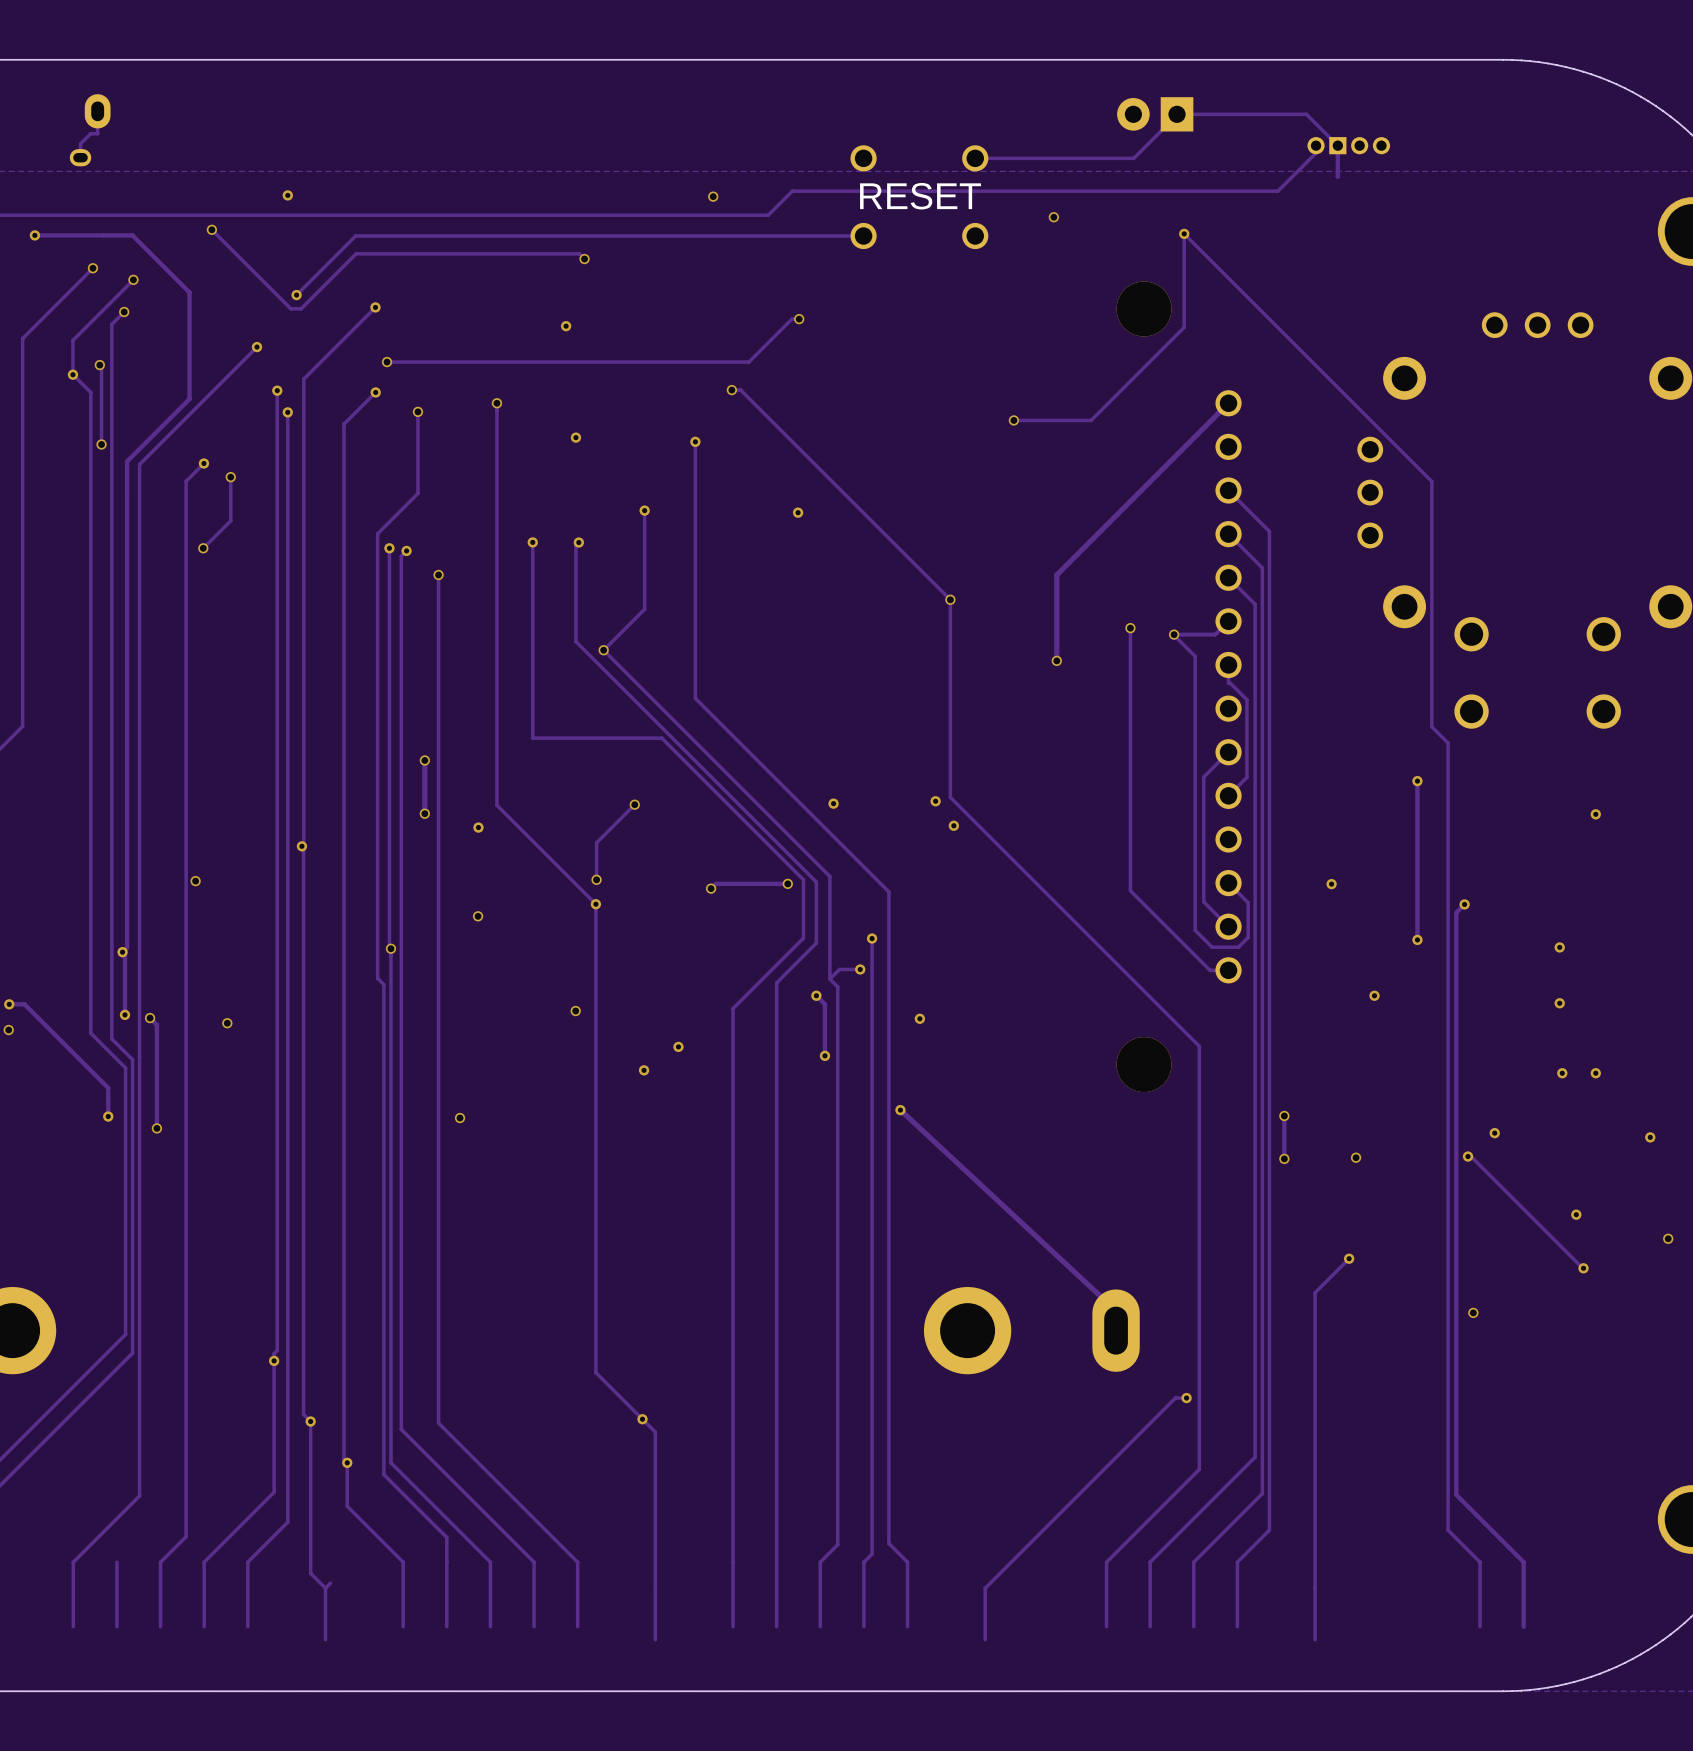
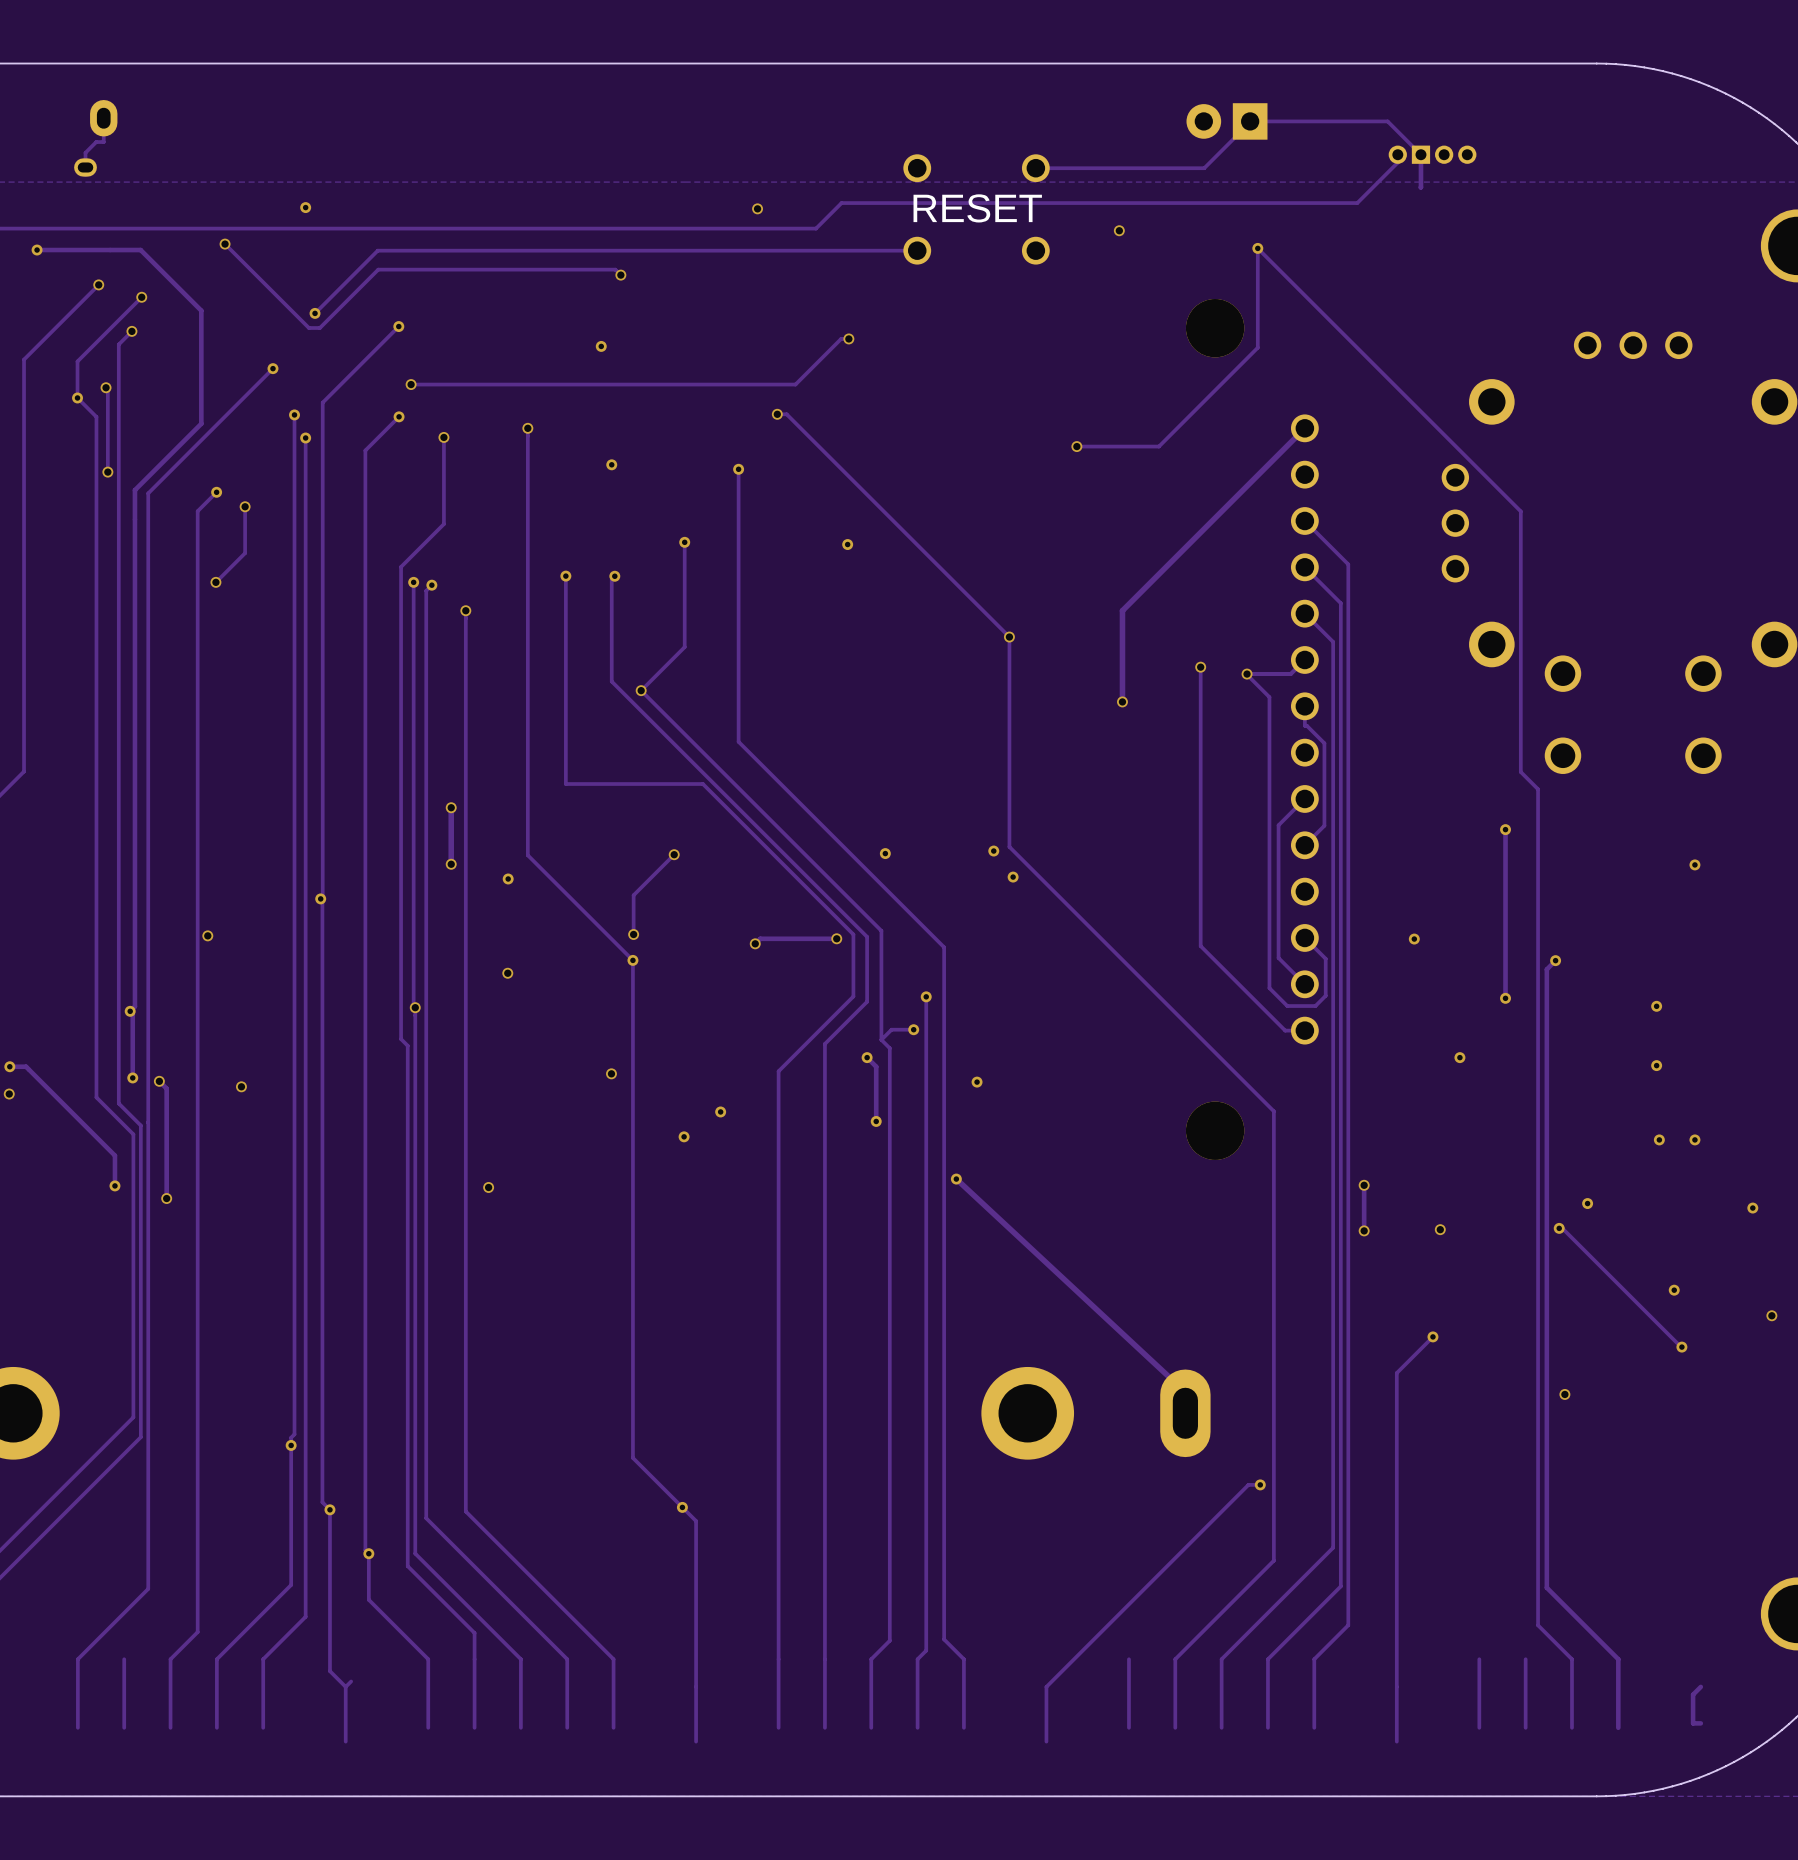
track: none -> (1128, 1659) (1128, 1727)
track: none -> (1479, 1659) (1479, 1727)
track: none -> (1525, 1659) (1525, 1727)
track: none -> (1700, 1686) (1693, 1694) (1693, 1723) (1700, 1723)

